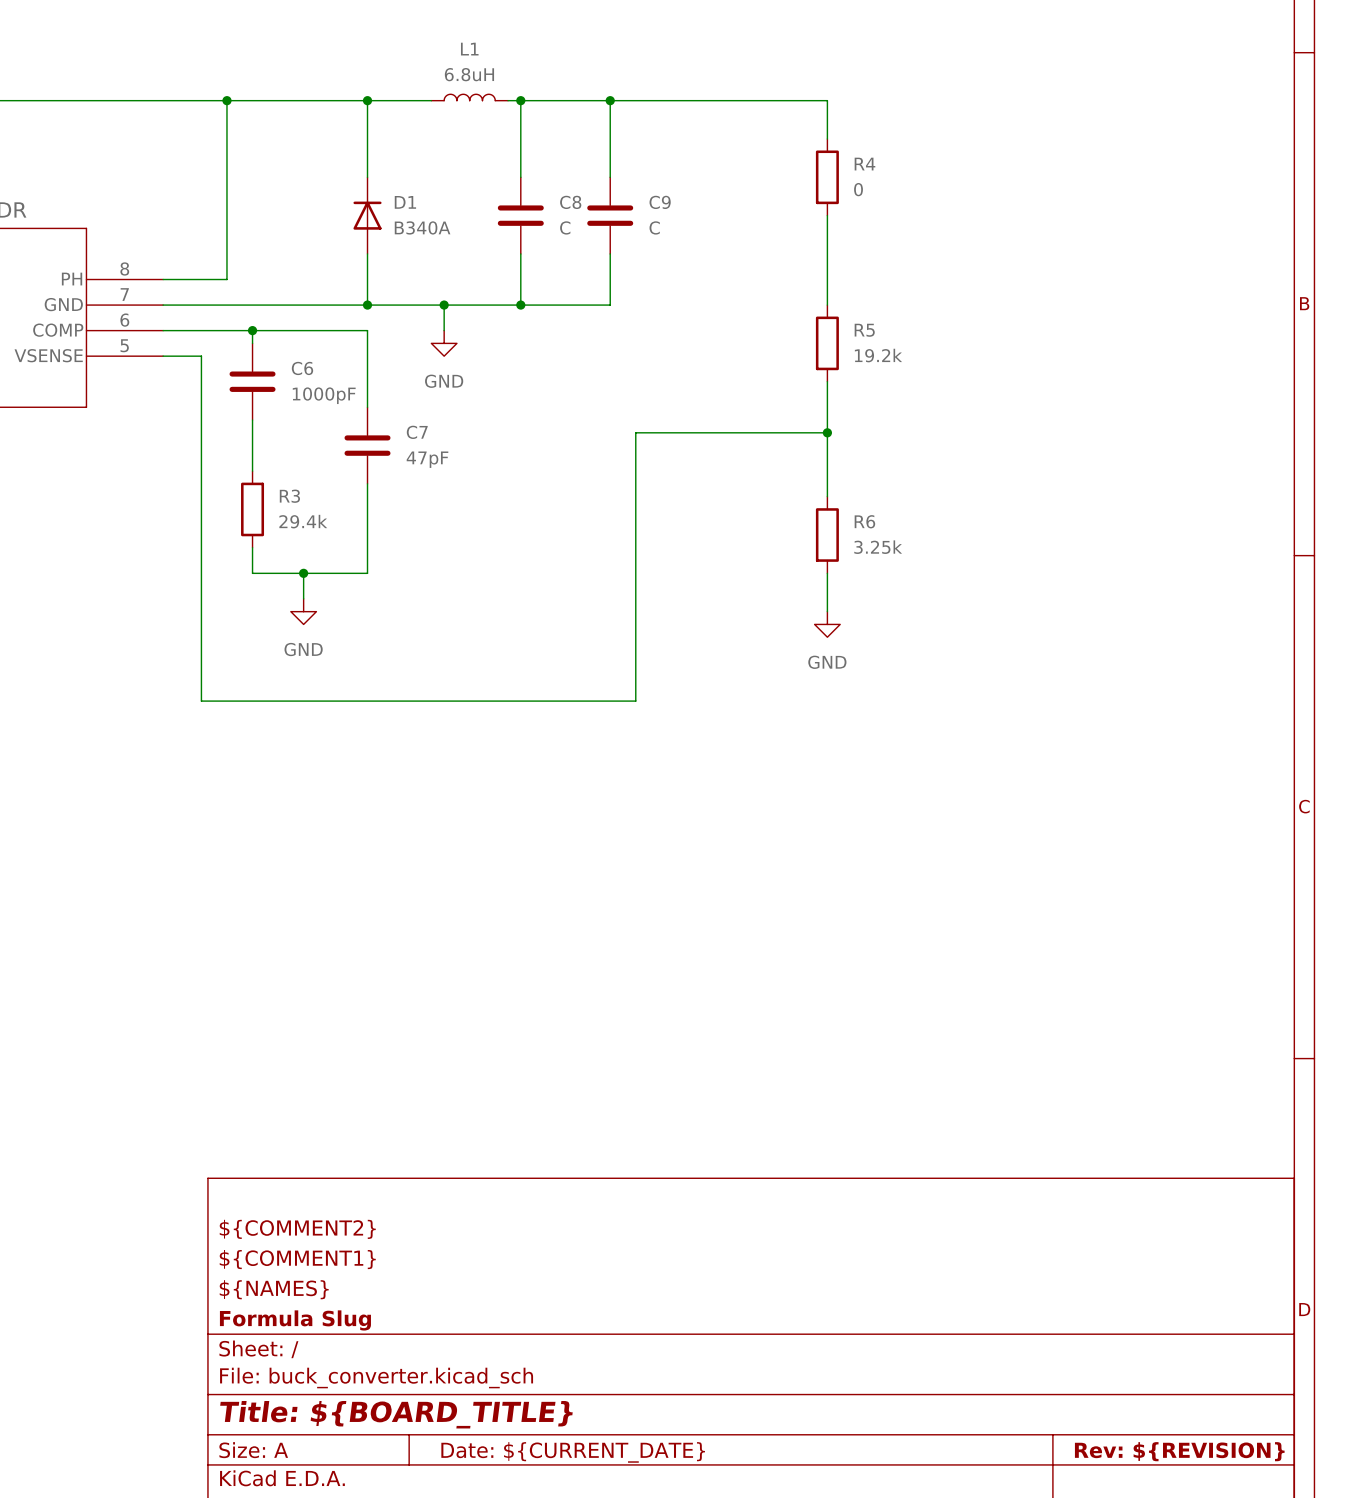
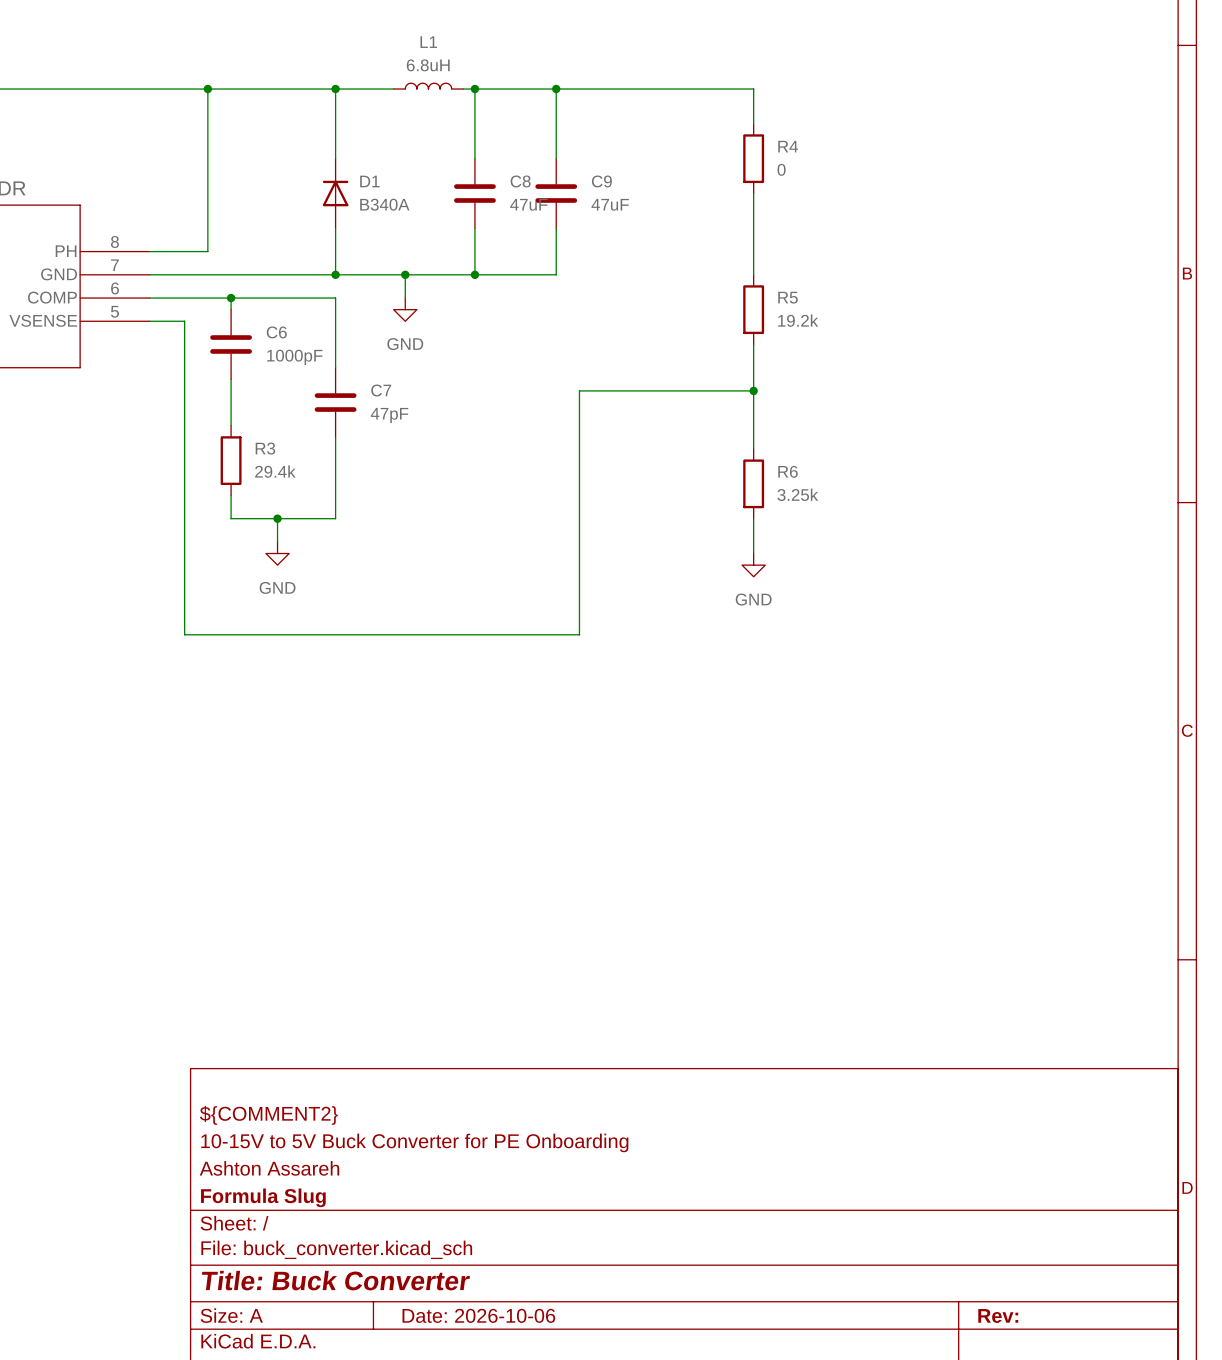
C8 value: C (565, 227) -> 47uF (528, 204)
C9 value: C (654, 227) -> 47uF (610, 204)
title block: ${COMMENT1} (297, 1259) -> 10-15V to 5V Buck Converter for PE Onboarding (414, 1142)
title block: ${NAMES} (274, 1289) -> Ashton Assareh (269, 1168)
title block: Title: ${BOARD_TITLE} (396, 1414) -> Title: Buck Converter (335, 1280)
title block: Rev: ${REVISION} (1179, 1451) -> Rev: (998, 1315)
title block: Date: ${CURRENT_DATE} (573, 1452) -> Date: 2026-10-06 (478, 1315)

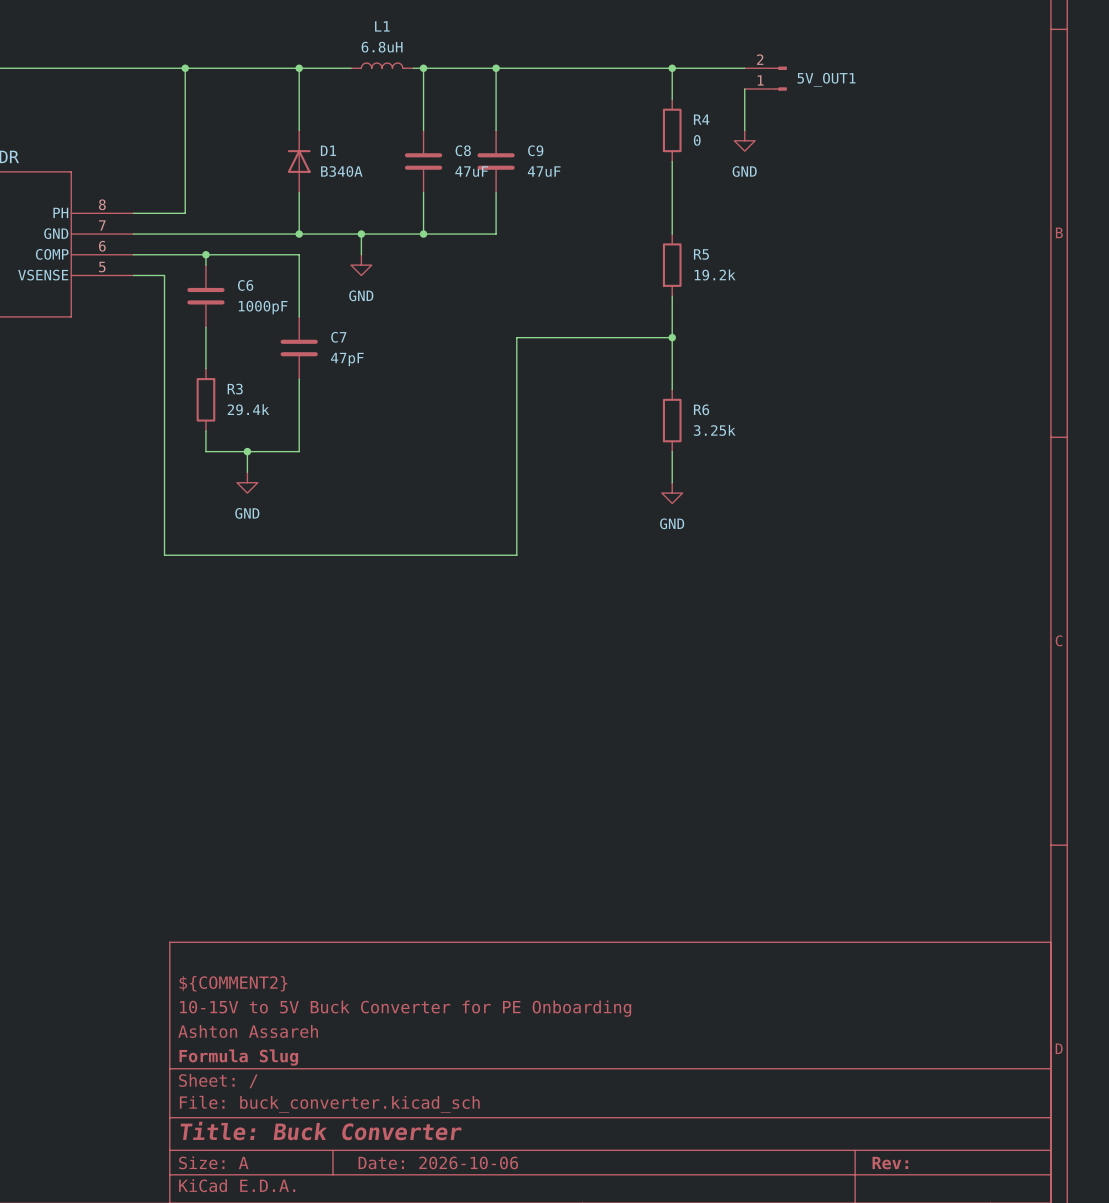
wire: none -> (672, 68) (744, 68)
junction: none -> (672, 68)
5V_OUT1: none -> (765, 78)
wire: none -> (744, 88) (744, 130)
power symbol: none -> GND (744, 140)

